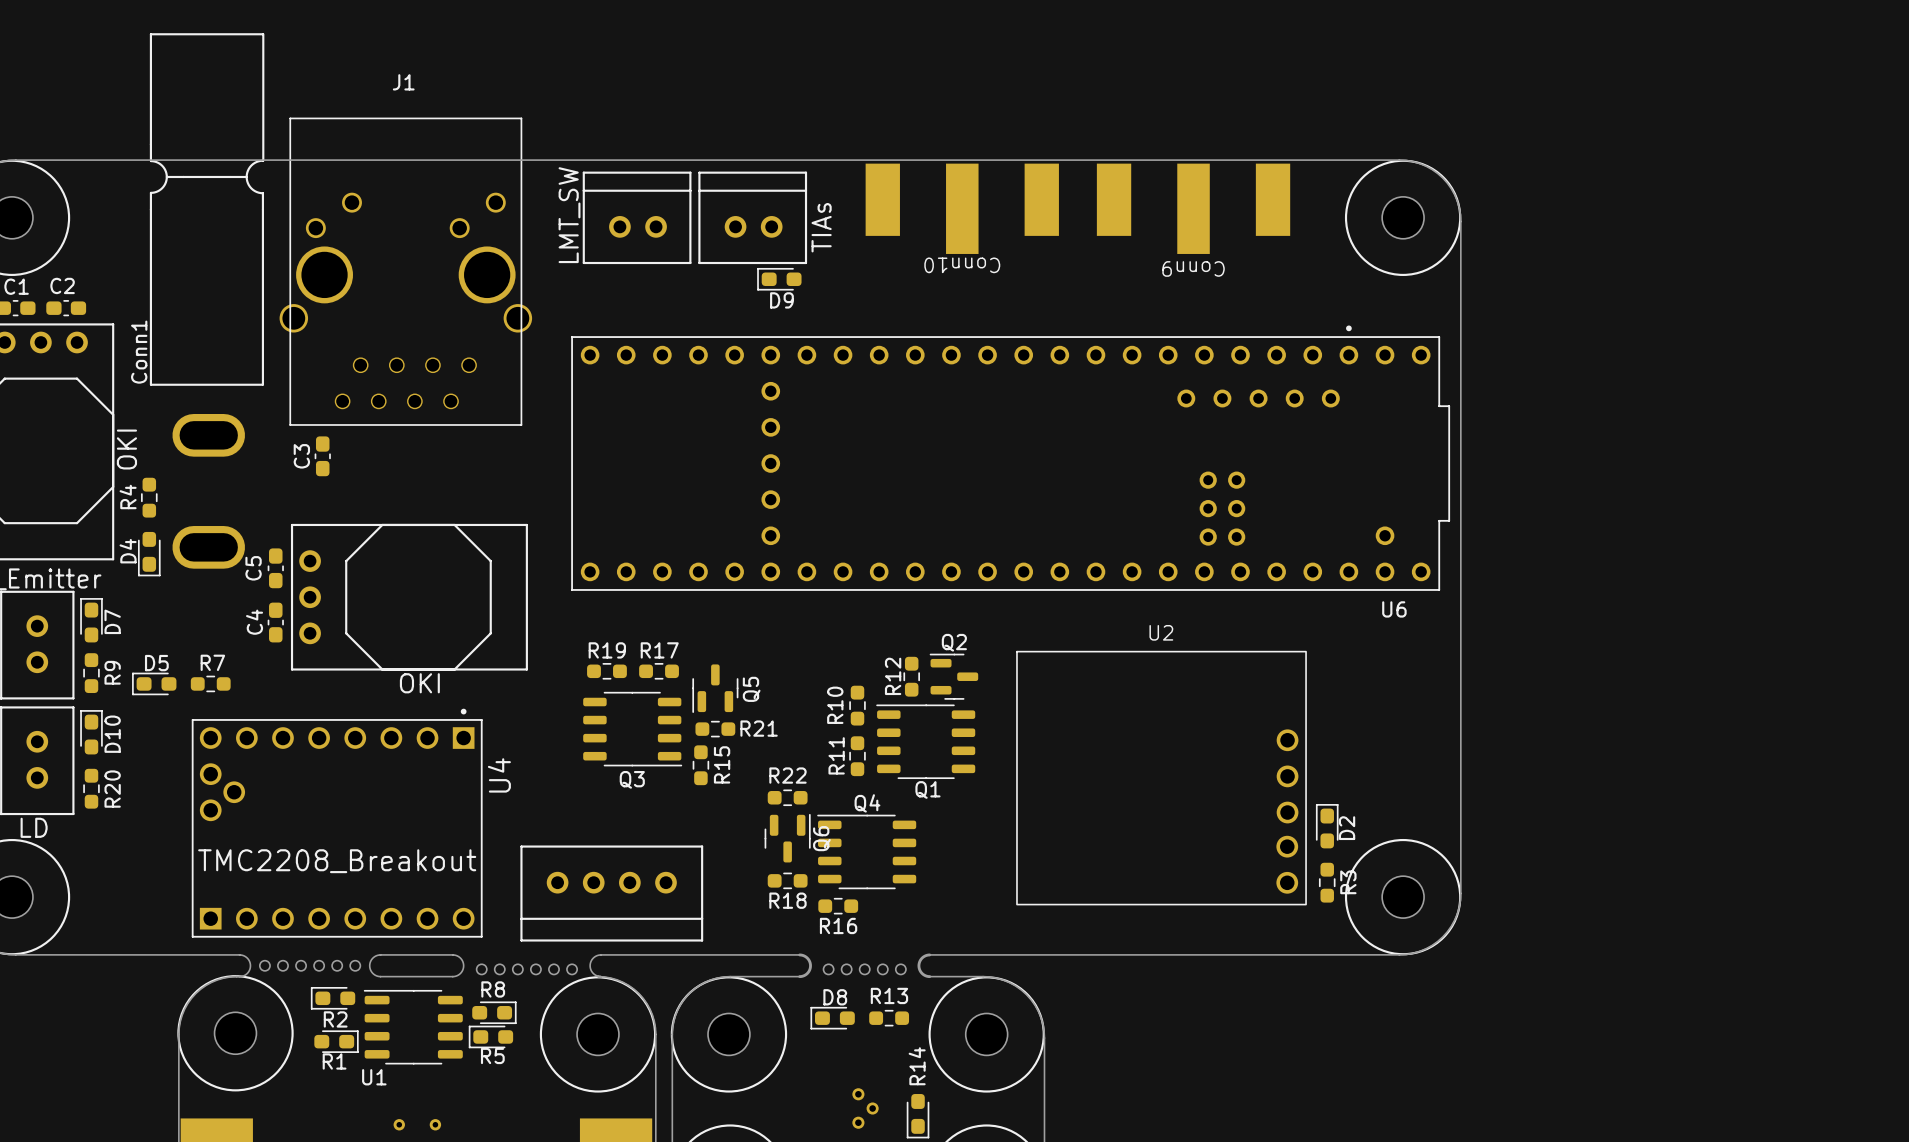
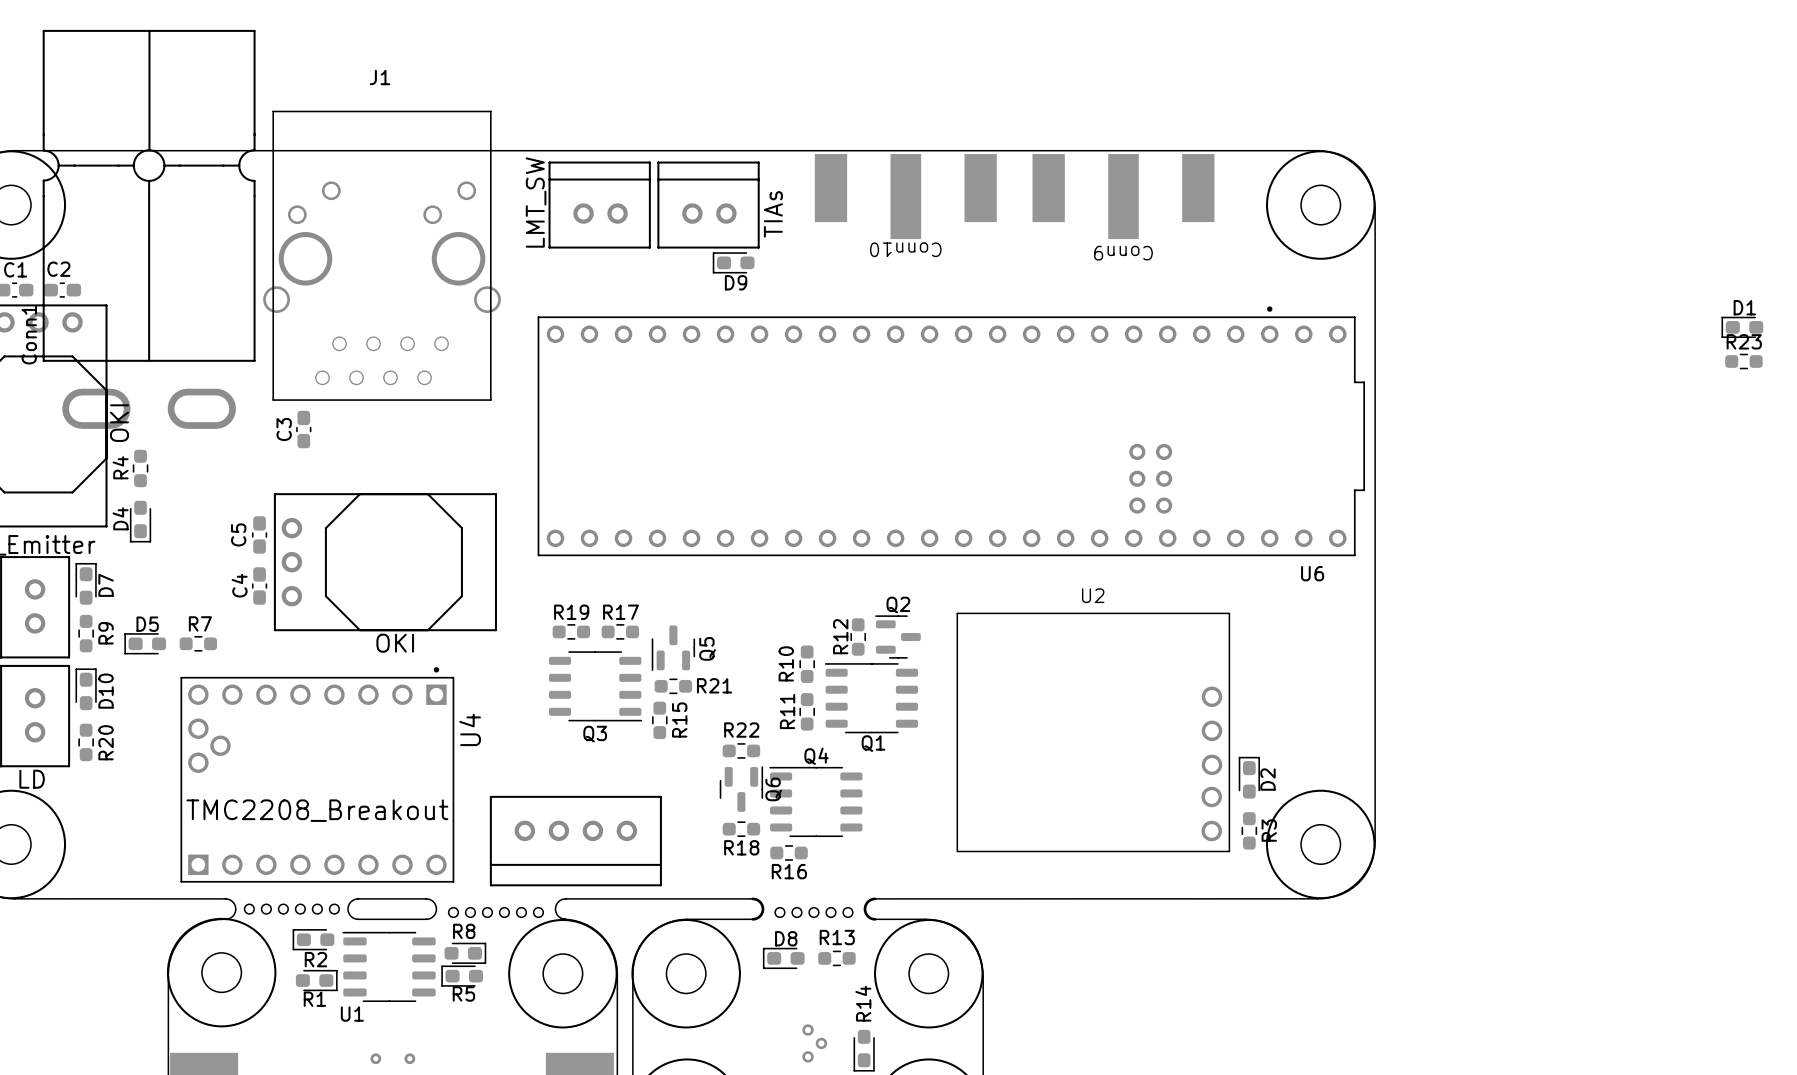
Conn1 footprint: [149, 33, 265, 569] -> [42, 29, 256, 429]
U6 footprint: [571, 325, 1451, 591] -> [537, 306, 1366, 557]
D1: none -> (1742, 327)
Conn1 name position: Conn1 (139, 352) -> Conn1 (29, 334)
R23: none -> (1743, 361)

